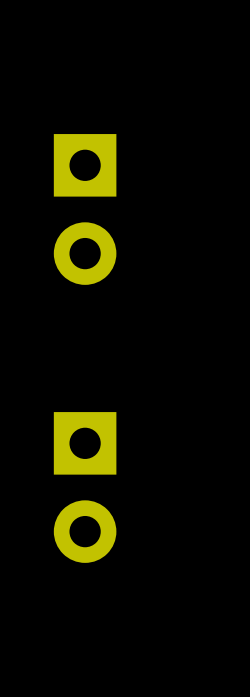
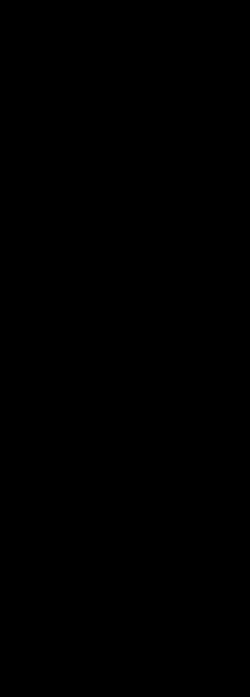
part: (85, 209) -> none
part: (85, 487) -> none

